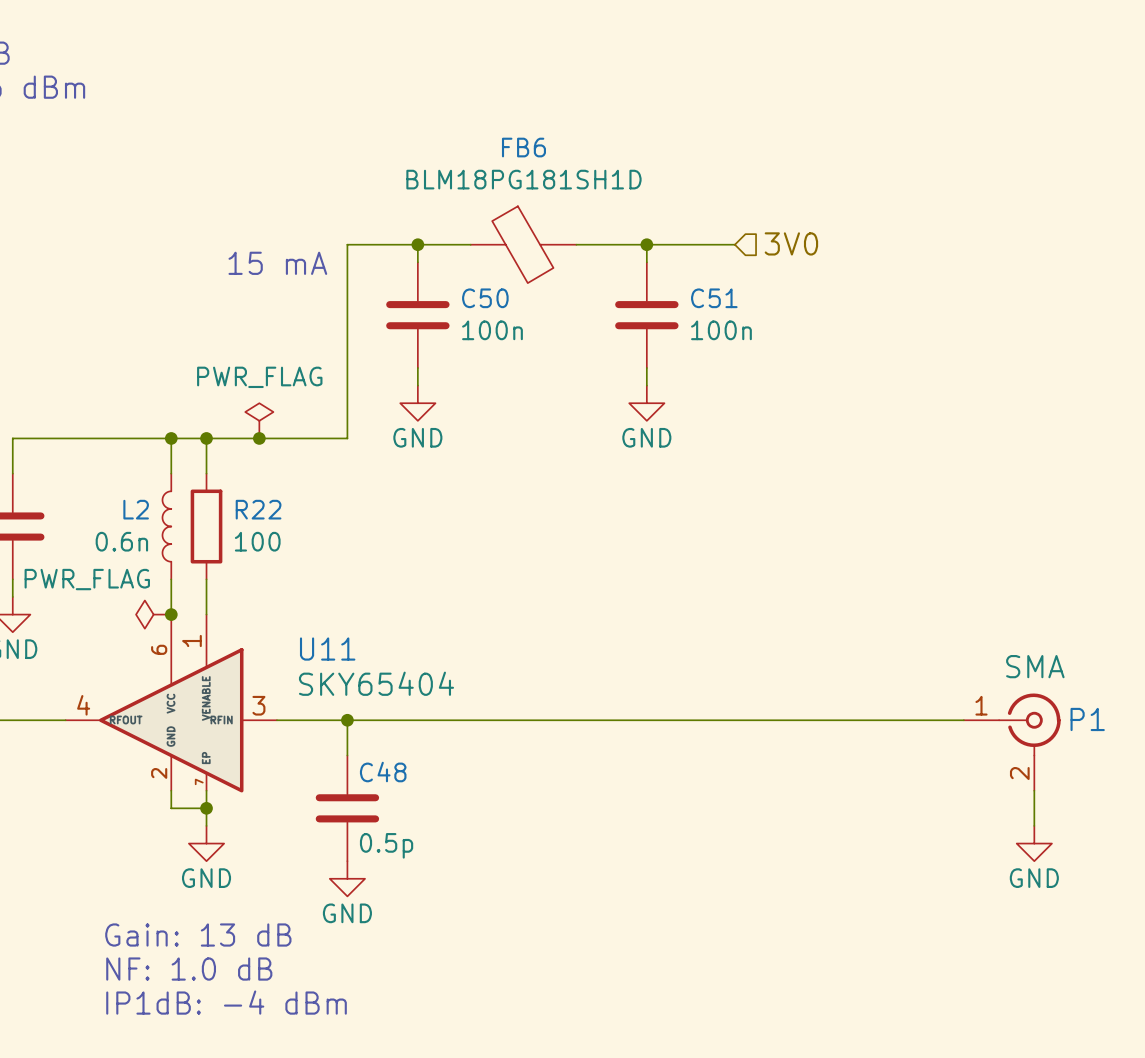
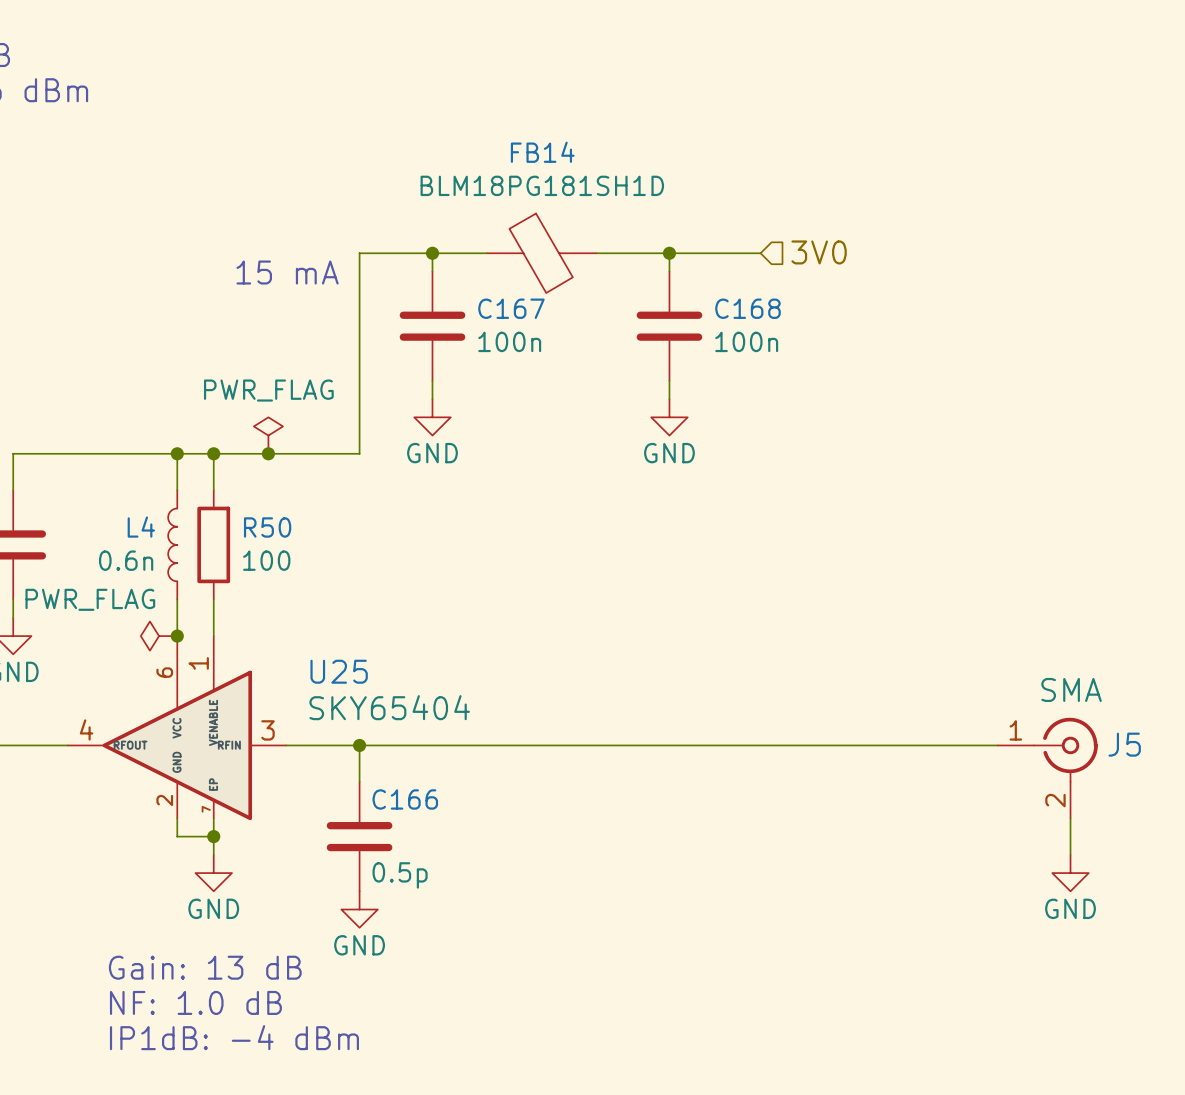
FB6 name: FB6 (523, 147) -> FB14 (542, 152)
C50 name: C50 (485, 298) -> C167 (511, 308)
C51 name: C51 (714, 298) -> C168 (747, 308)
L2 name: L2 (136, 509) -> L4 (141, 527)
R22 name: R22 (258, 509) -> R50 (267, 527)
U11 name: U11 (327, 649) -> U25 (339, 671)
P1 name: P1 (1087, 719) -> J5 (1124, 744)
C48 name: C48 (383, 772) -> C166 (405, 799)

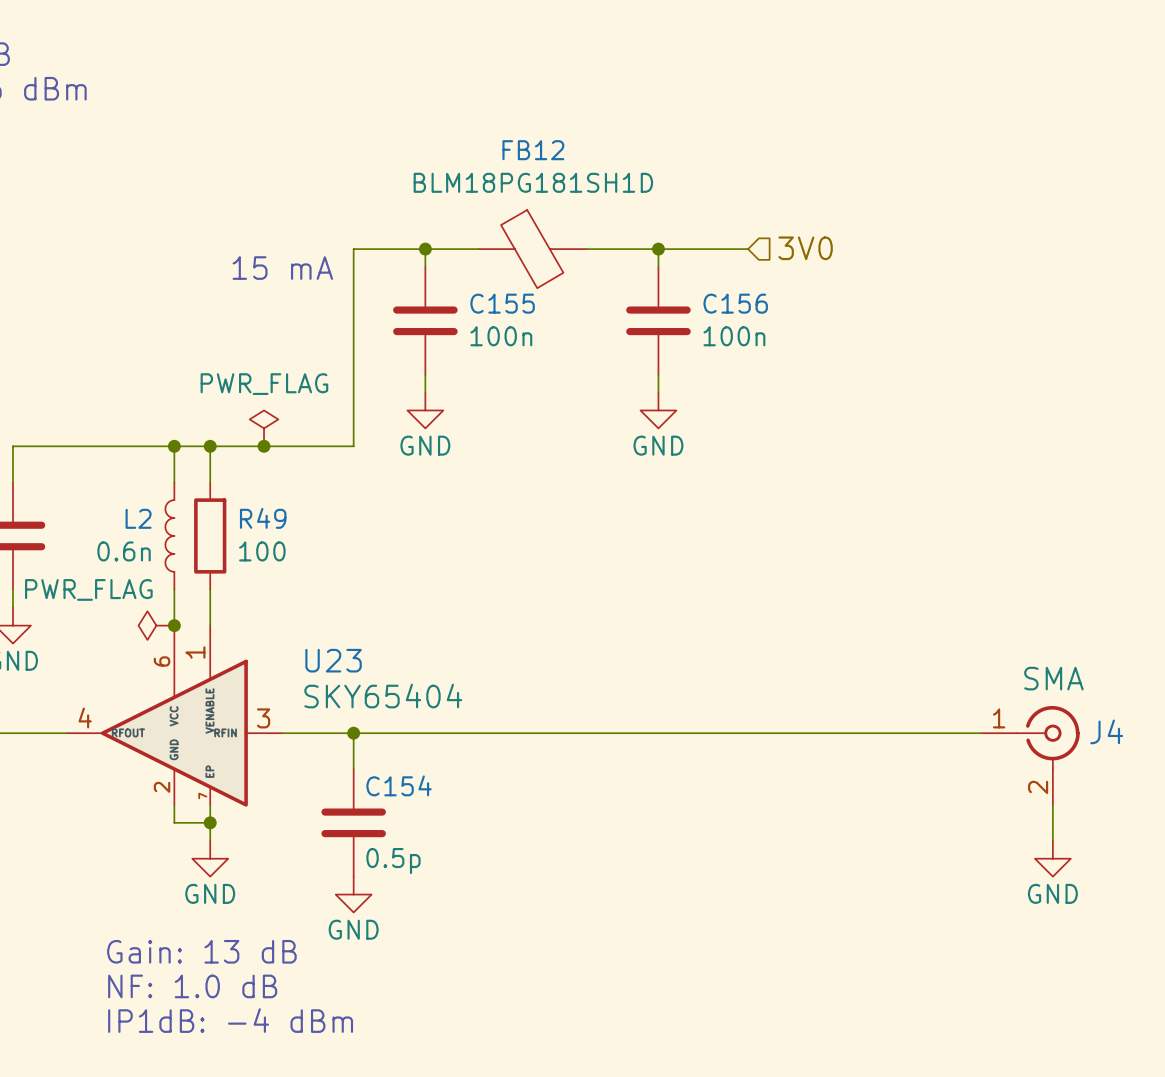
FB14 name: FB14 (542, 152) -> FB12 (533, 150)
C167 name: C167 (511, 308) -> C155 (502, 303)
C168 name: C168 (747, 308) -> C156 (735, 303)
L4 name: L4 (141, 527) -> L2 (138, 518)
R50 name: R50 (267, 527) -> R49 (263, 518)
U25 name: U25 (339, 671) -> U23 (333, 660)
J5 name: J5 (1124, 744) -> J4 (1106, 731)
C166 name: C166 (405, 799) -> C154 (399, 785)

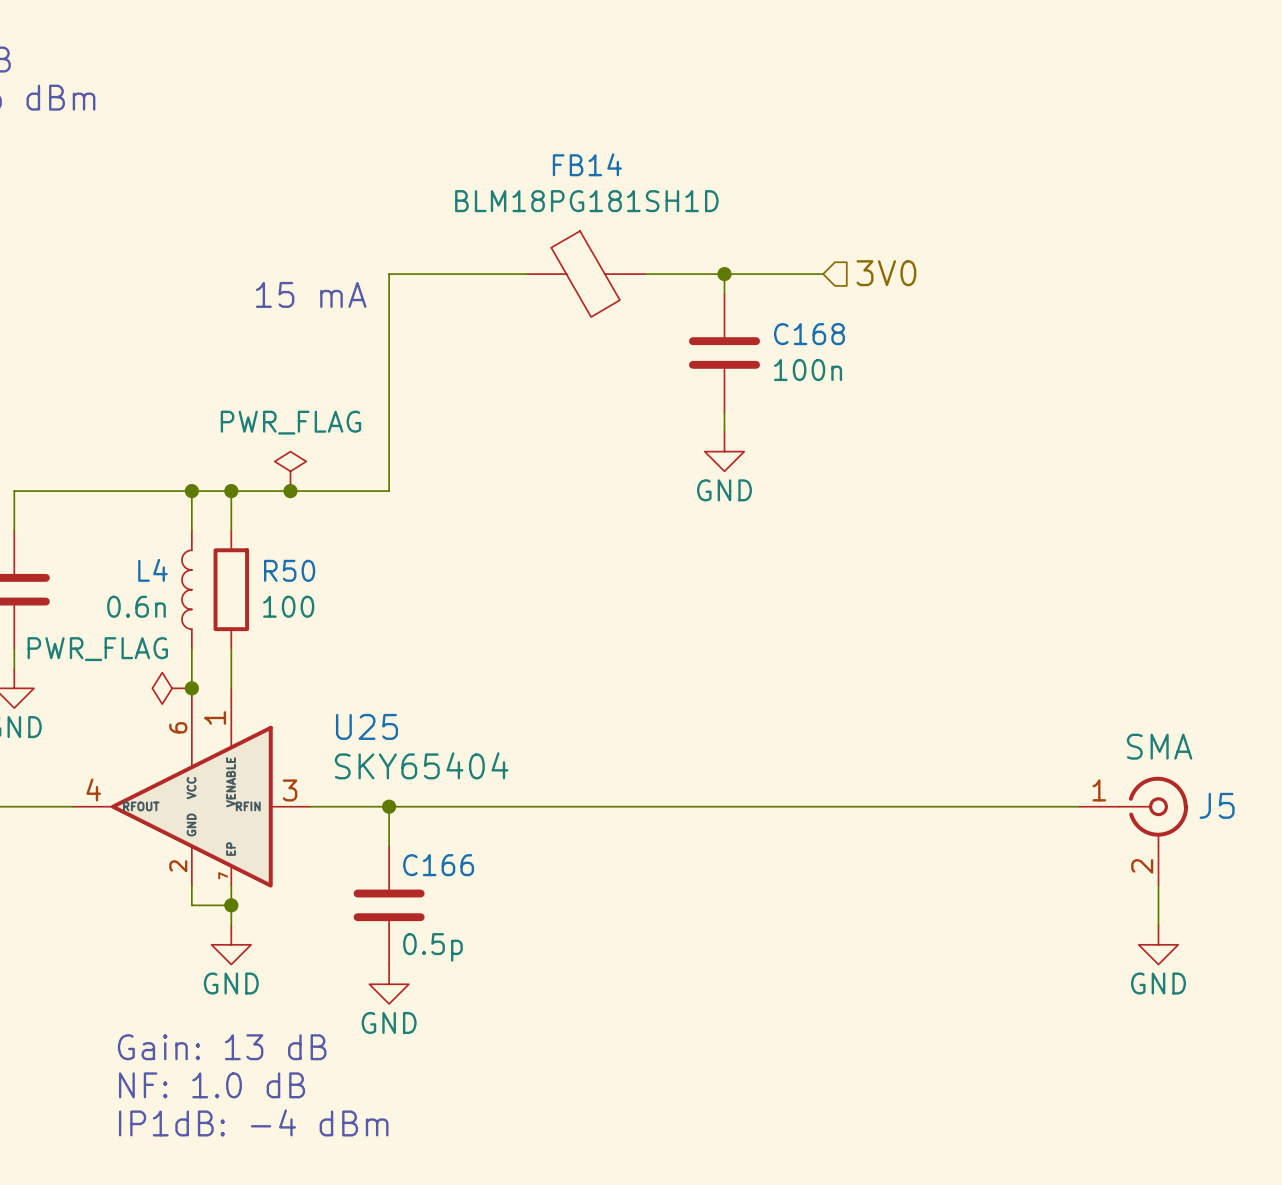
FB12 name: FB12 (533, 150) -> FB14 (587, 164)
wire: (425, 249) (425, 267) -> none
junction: (425, 249) -> none
C156 name: C156 (735, 303) -> C168 (809, 334)
C155: 100n (425, 320) -> none
wire: (425, 374) (425, 392) -> none
power symbol: GND (425, 410) -> none
L2 name: L2 (138, 518) -> L4 (152, 570)
R49 name: R49 (263, 518) -> R50 (289, 570)
U23 name: U23 (333, 660) -> U25 (367, 726)
J4 name: J4 (1106, 731) -> J5 (1217, 805)
C154 name: C154 (399, 785) -> C166 (438, 865)

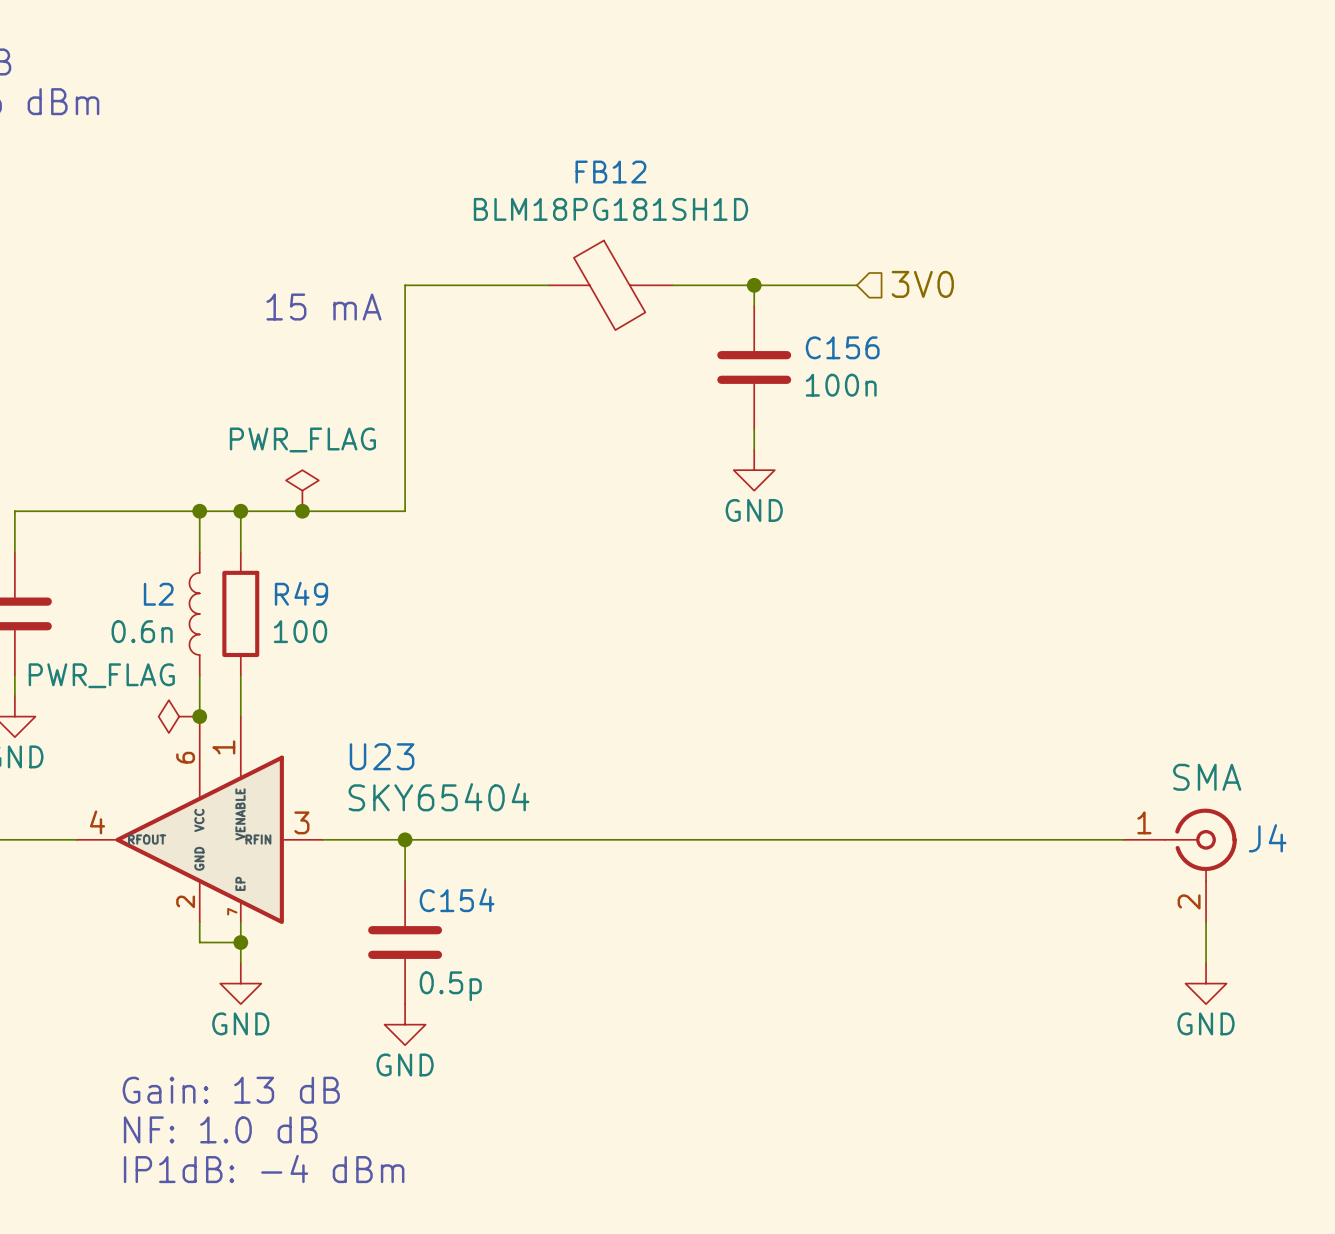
FB14 name: FB14 (587, 164) -> FB12 (610, 172)
C168 name: C168 (809, 334) -> C156 (842, 347)
L4 name: L4 (152, 570) -> L2 (158, 594)
R50 name: R50 (289, 570) -> R49 (301, 593)
U25 name: U25 (367, 726) -> U23 (382, 756)
J5 name: J5 (1217, 805) -> J4 (1267, 838)
C166 name: C166 (438, 865) -> C154 (457, 900)

